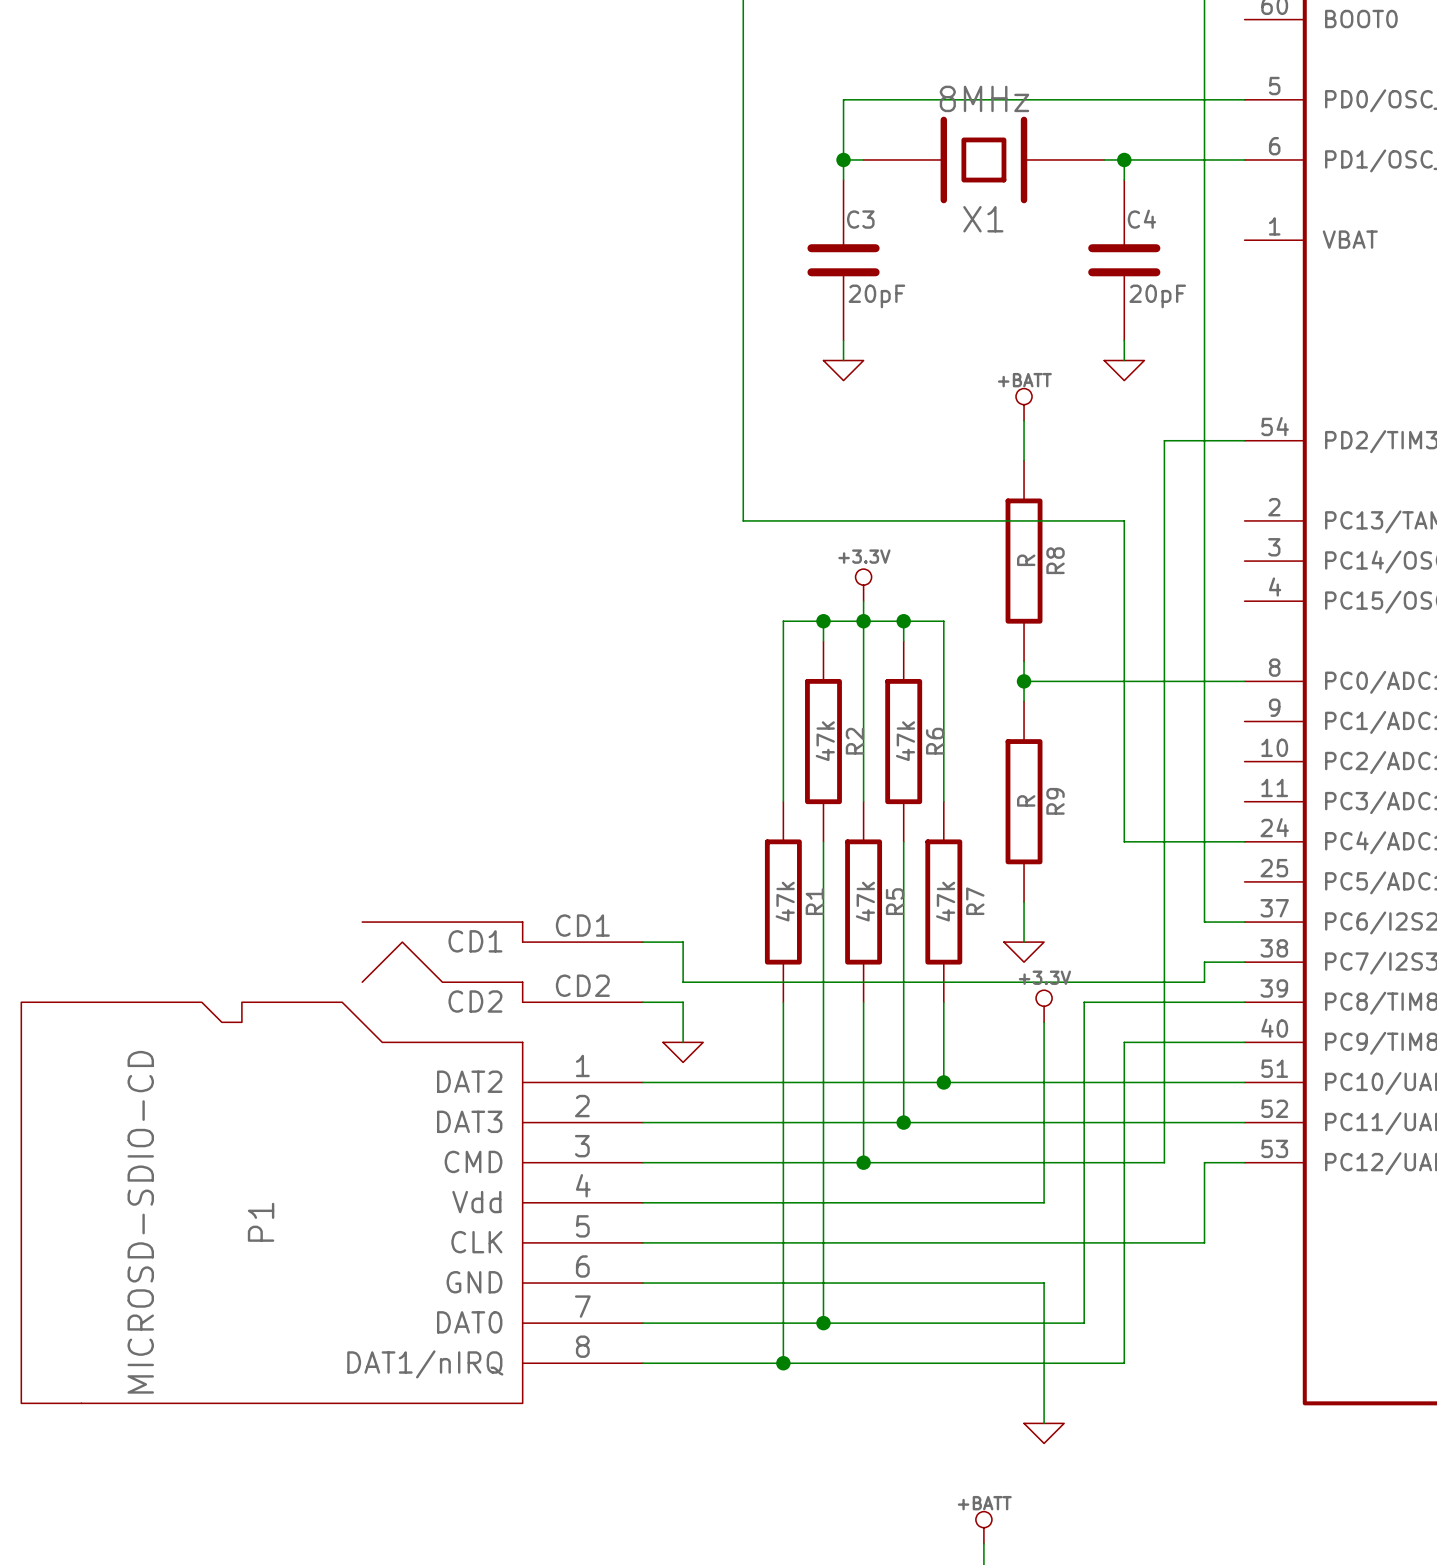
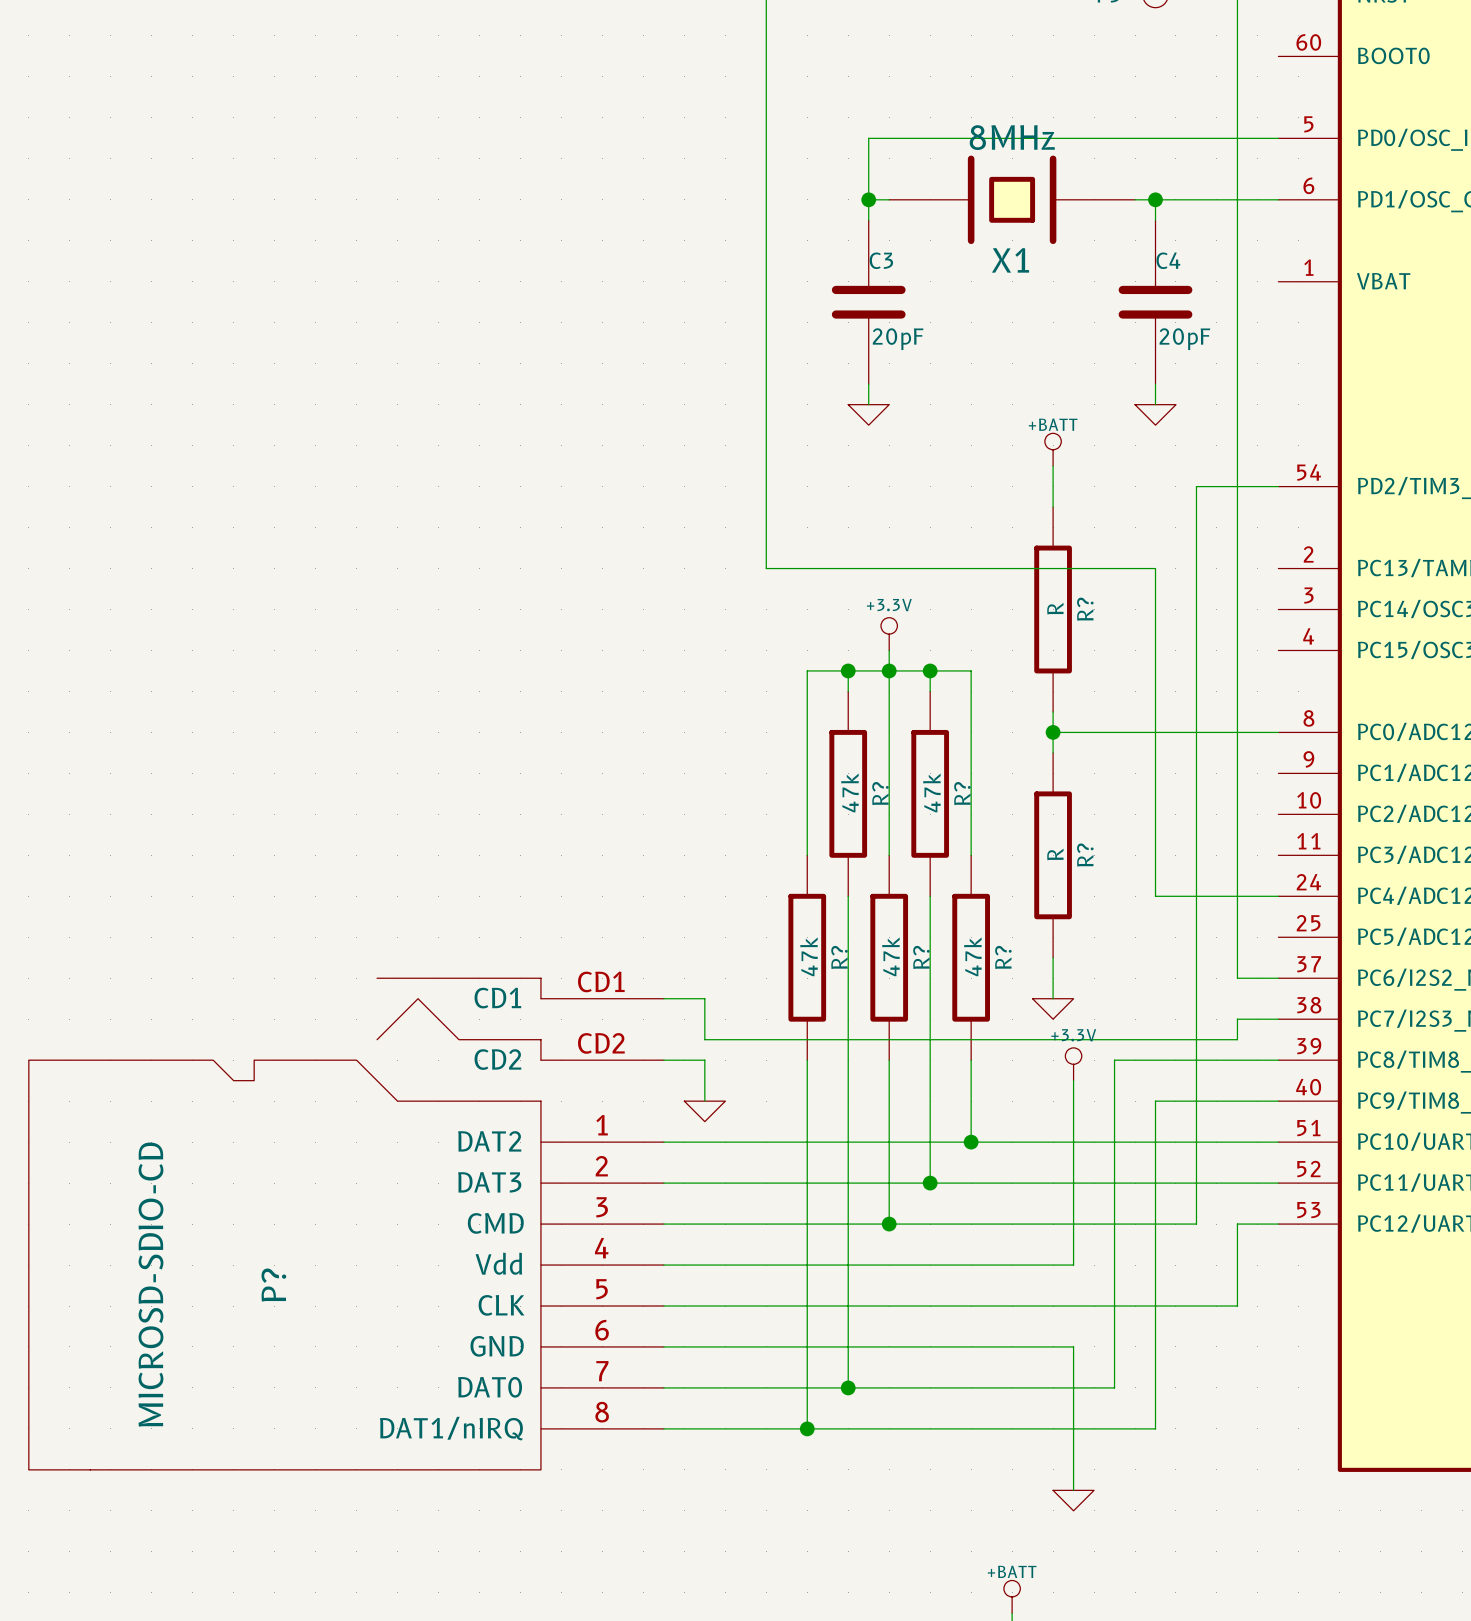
R8 name: R8 (1055, 560) -> R? (1085, 609)
R2 name: R2 (854, 741) -> R? (880, 793)
R6 name: R6 (935, 741) -> R? (962, 793)
R9 name: R9 (1055, 801) -> R? (1085, 855)
R1 name: R1 (814, 901) -> R? (839, 957)
R5 name: R5 (895, 901) -> R? (921, 957)
R7 name: R7 (975, 901) -> R? (1003, 957)
P1 name: P1 (261, 1222) -> P? (273, 1285)

